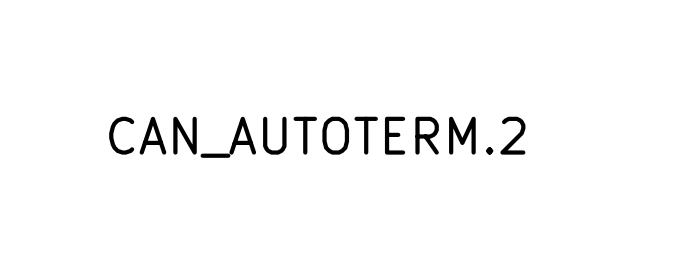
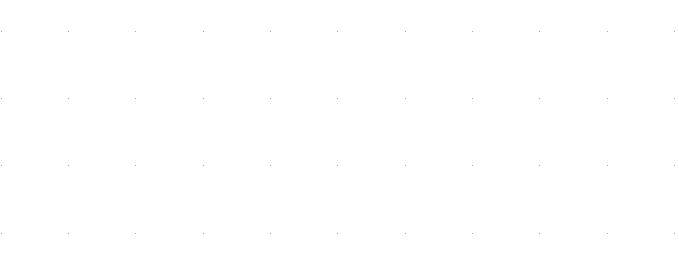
label: CAN_AUTOTERM.2 (317, 137) -> none

